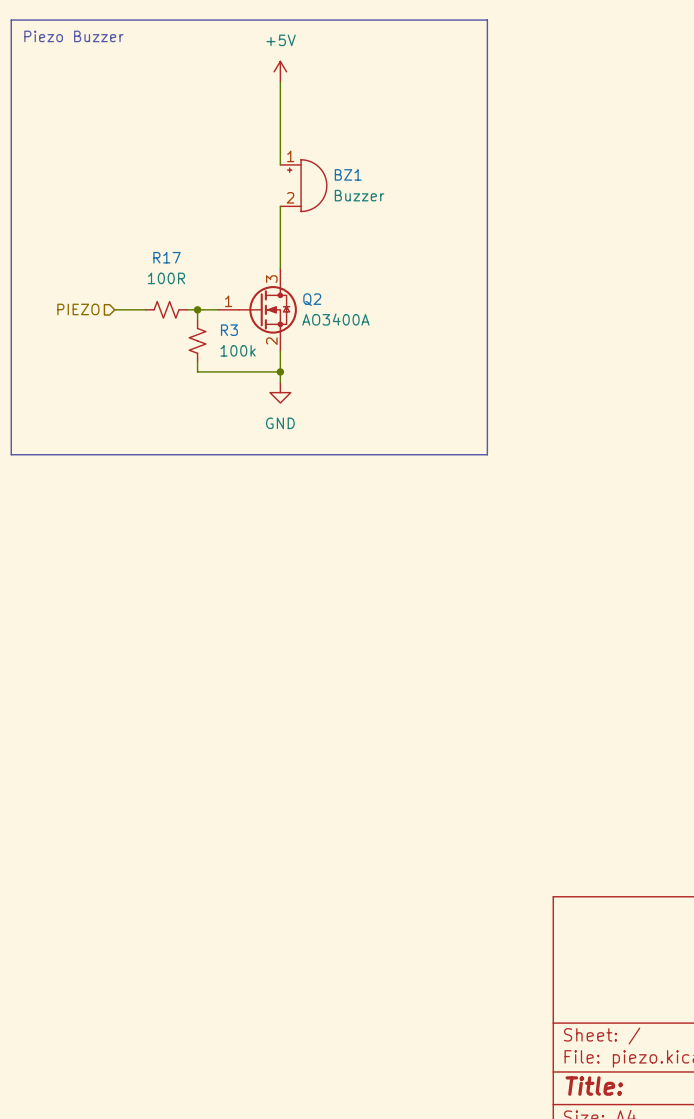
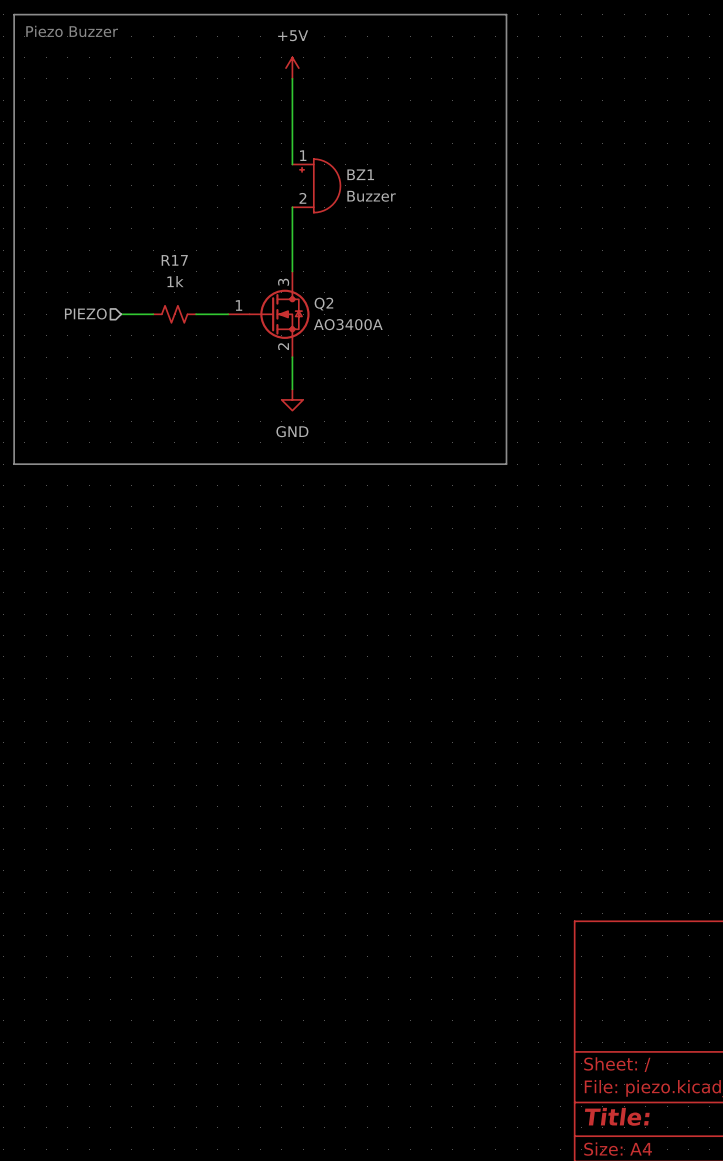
R17 value: 100R (166, 278) -> 1k (175, 281)
wire: (197, 309) (197, 320) -> none
junction: (197, 309) -> none
R3: 100k (197, 340) -> none
wire: (197, 361) (197, 371) (280, 371) -> none
junction: (280, 371) -> none

